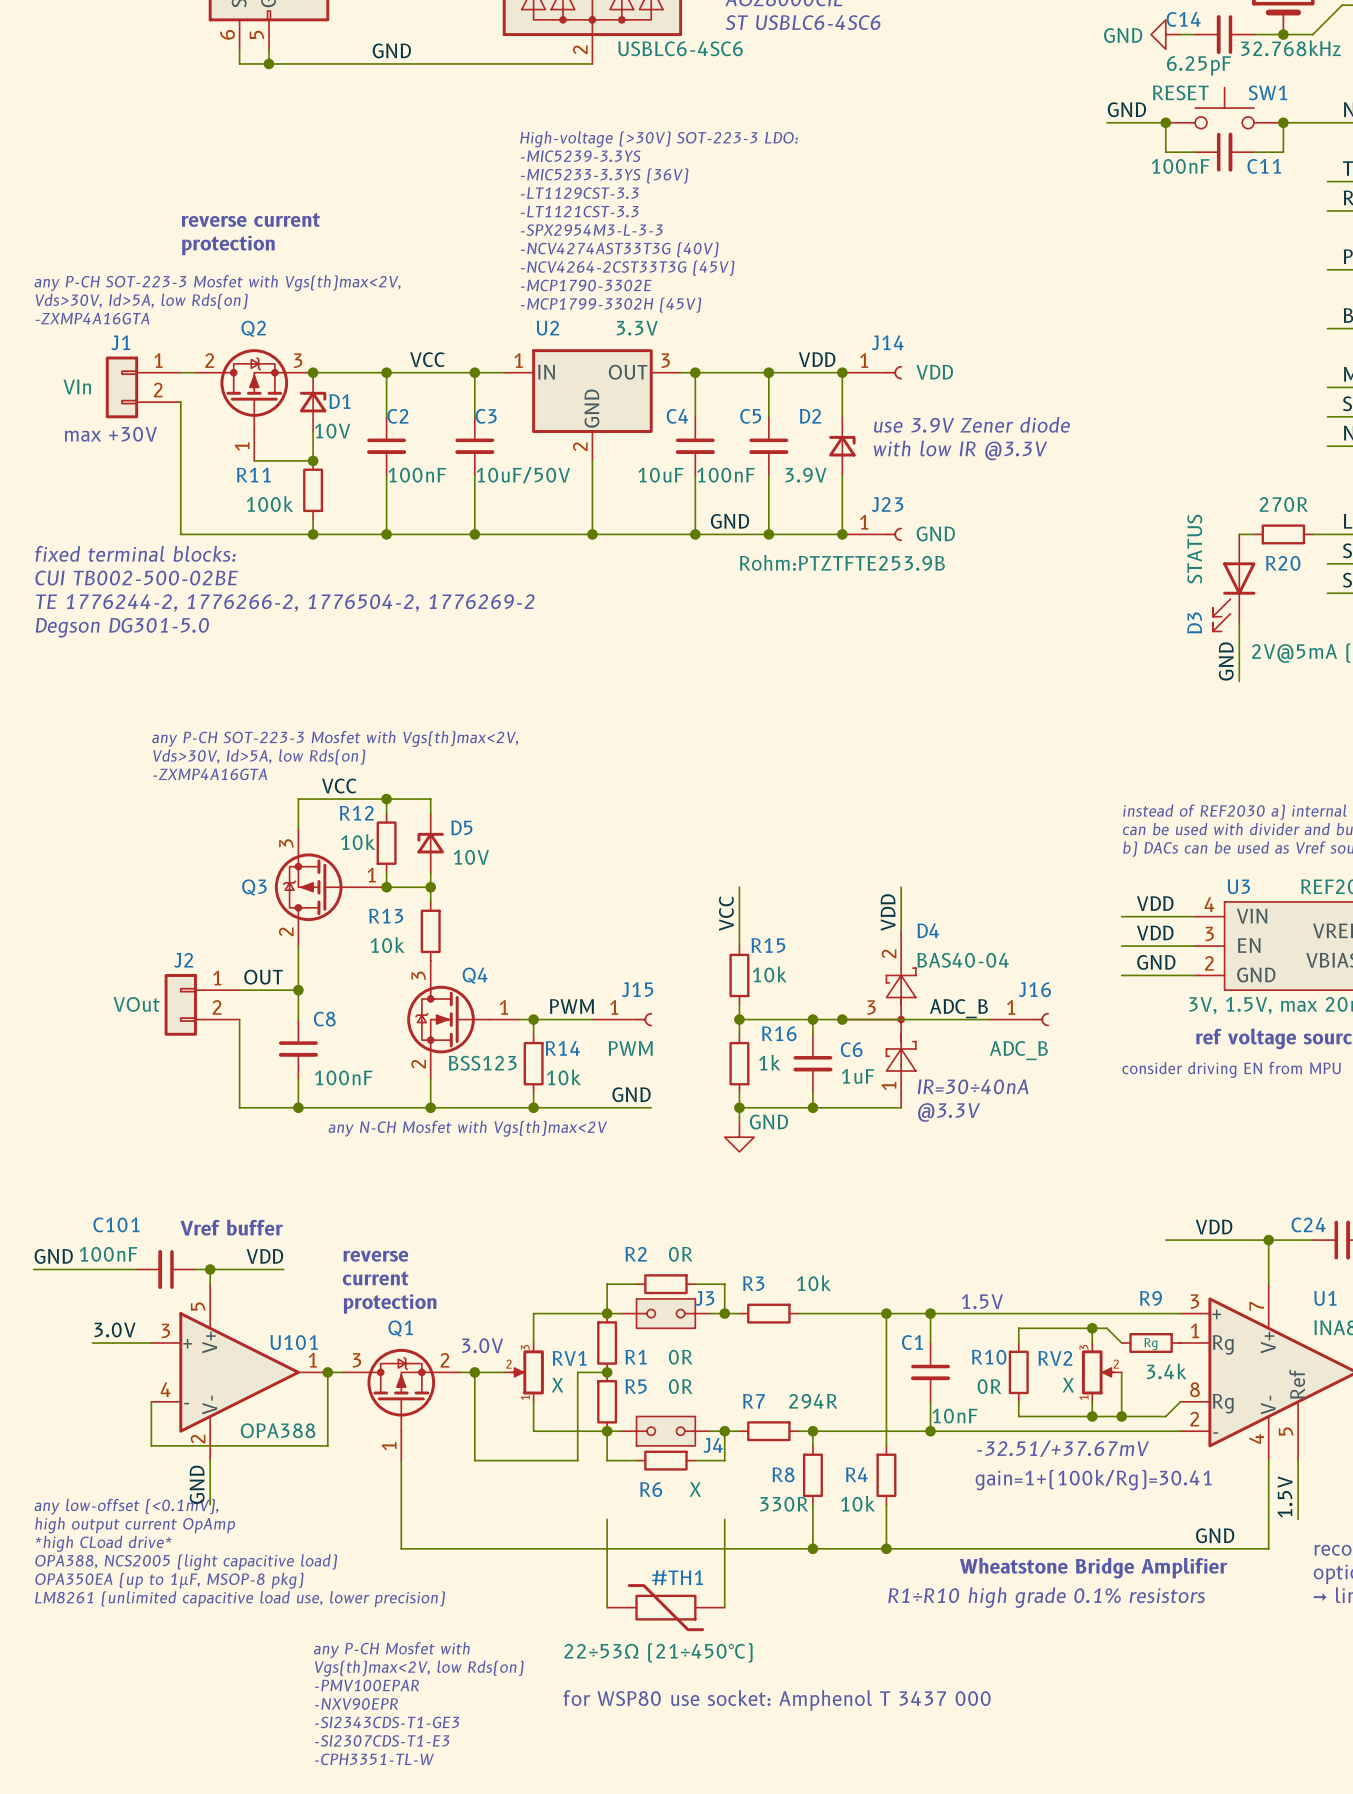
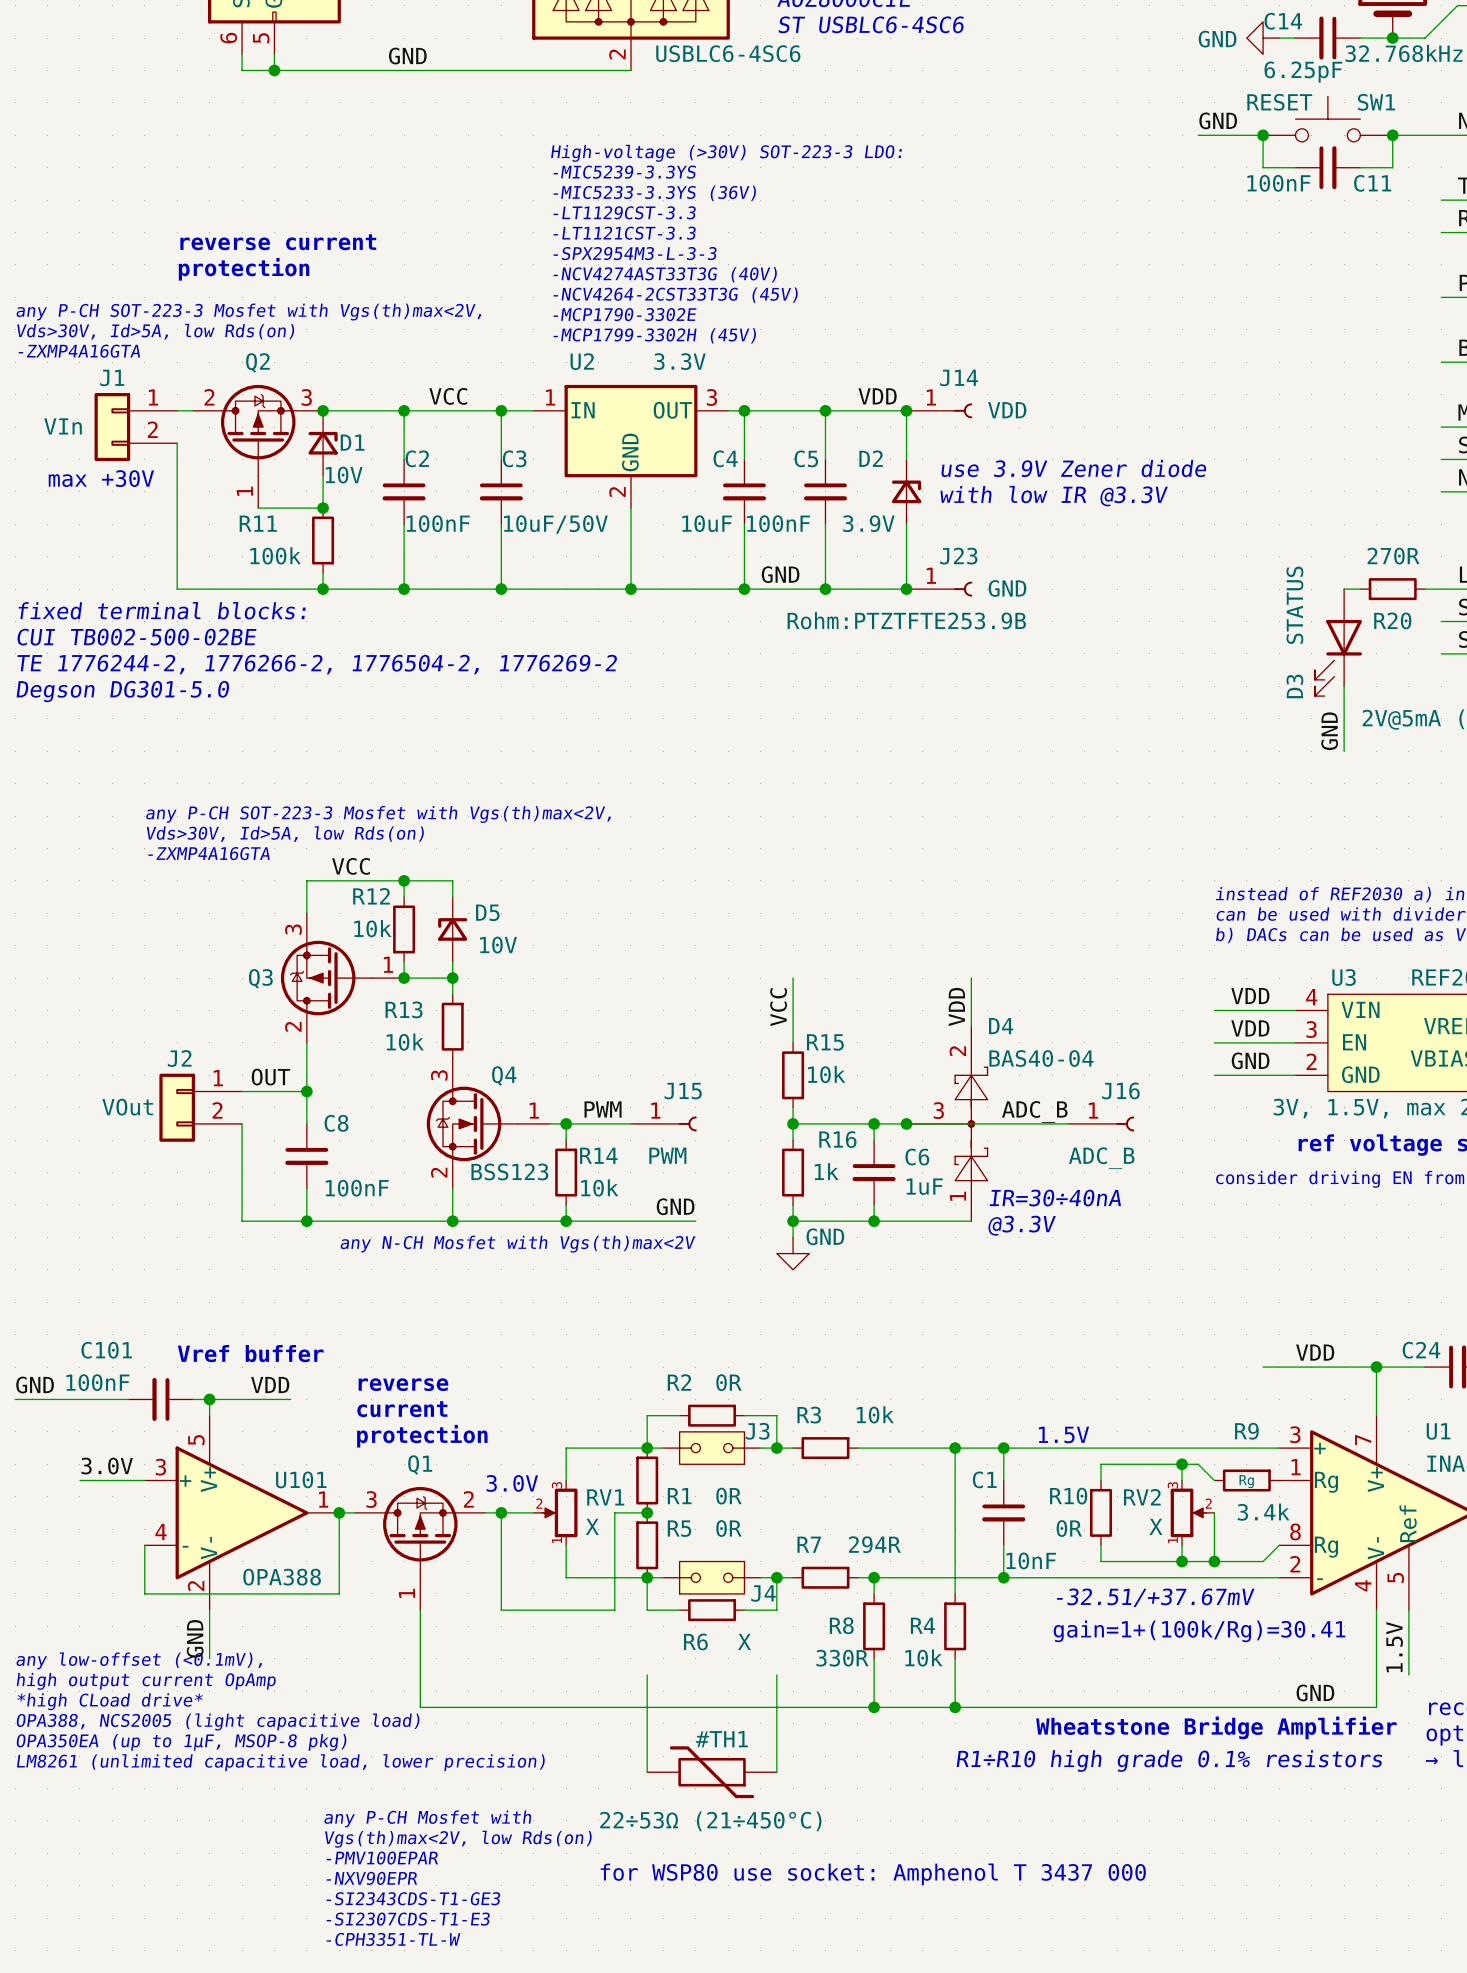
text: LM8261 (unlimited capacitive load use, lower precision) (240, 1599) -> LM8261 (unlimited capacitive load, lower precision) (280, 1762)

